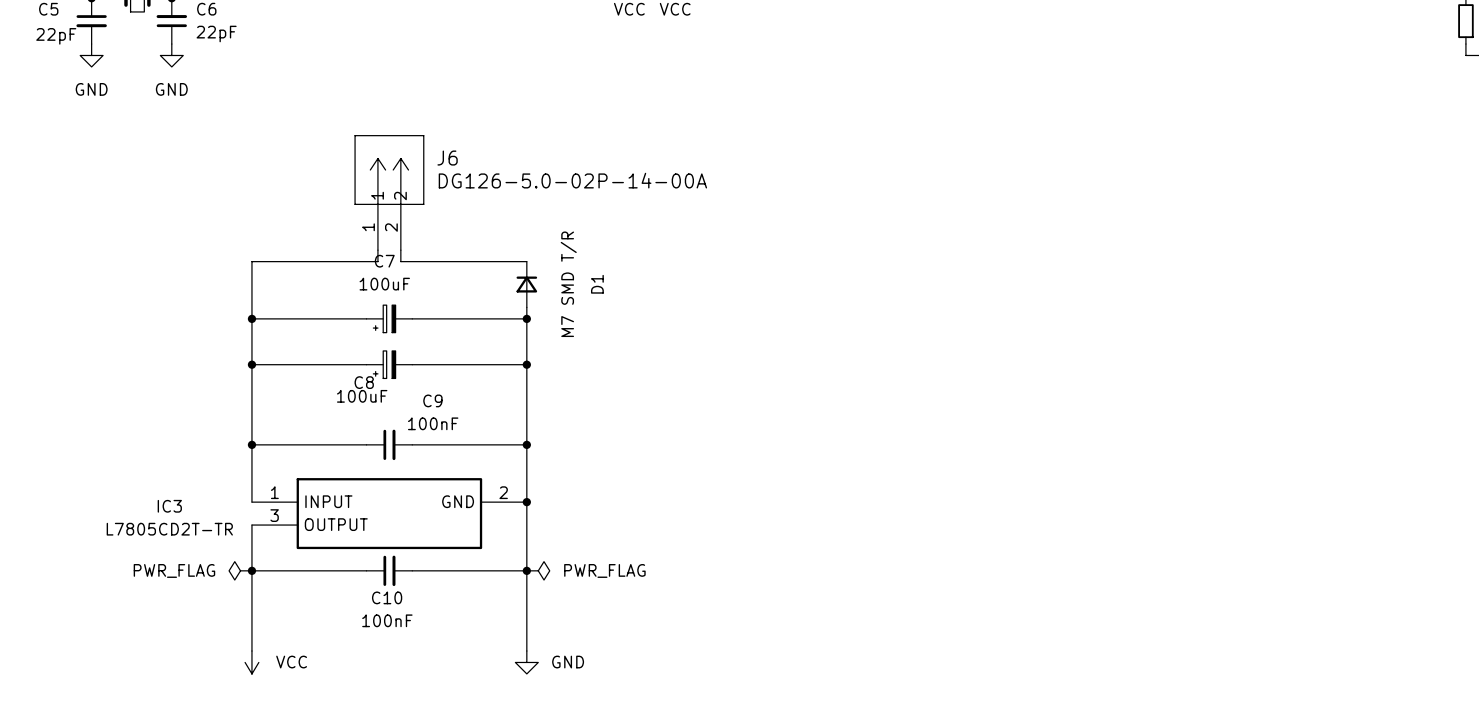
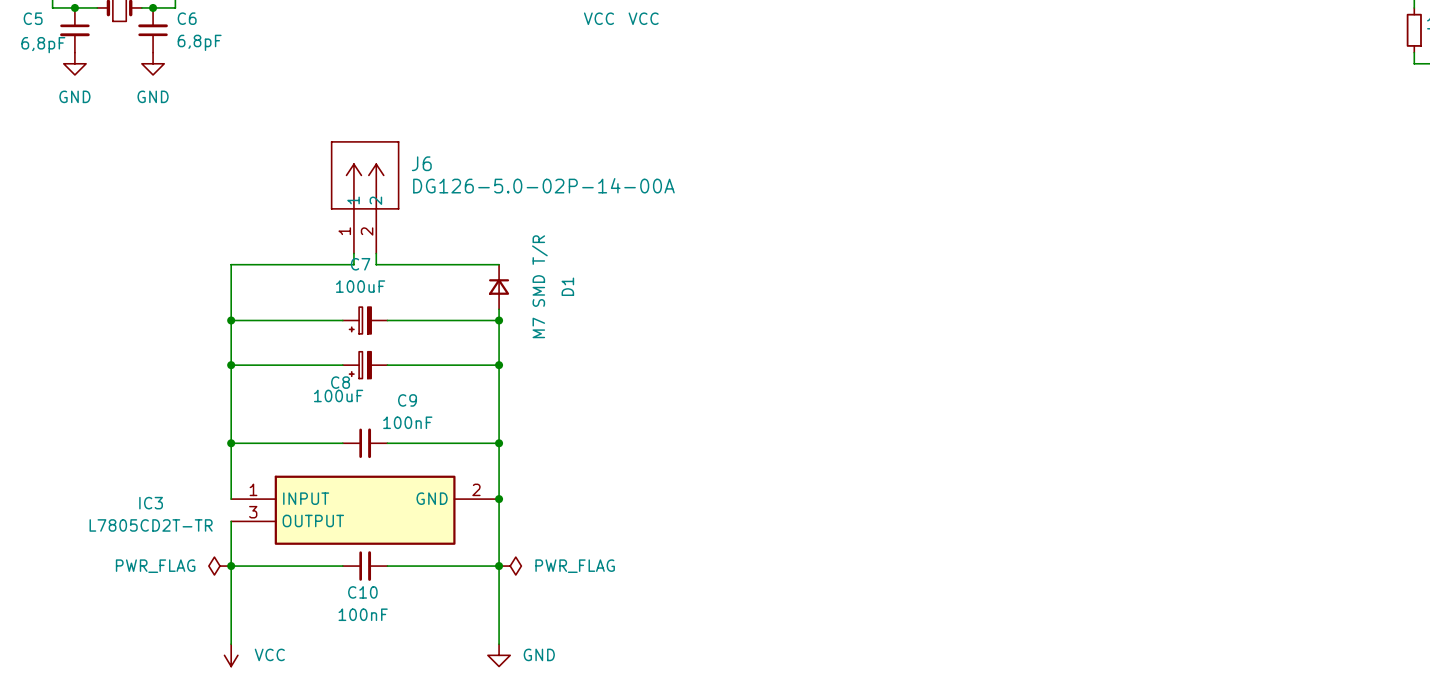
C6 value: 22pF (216, 34) -> 6,8pF (199, 42)
C5 value: 22pF (56, 36) -> 6,8pF (43, 45)

